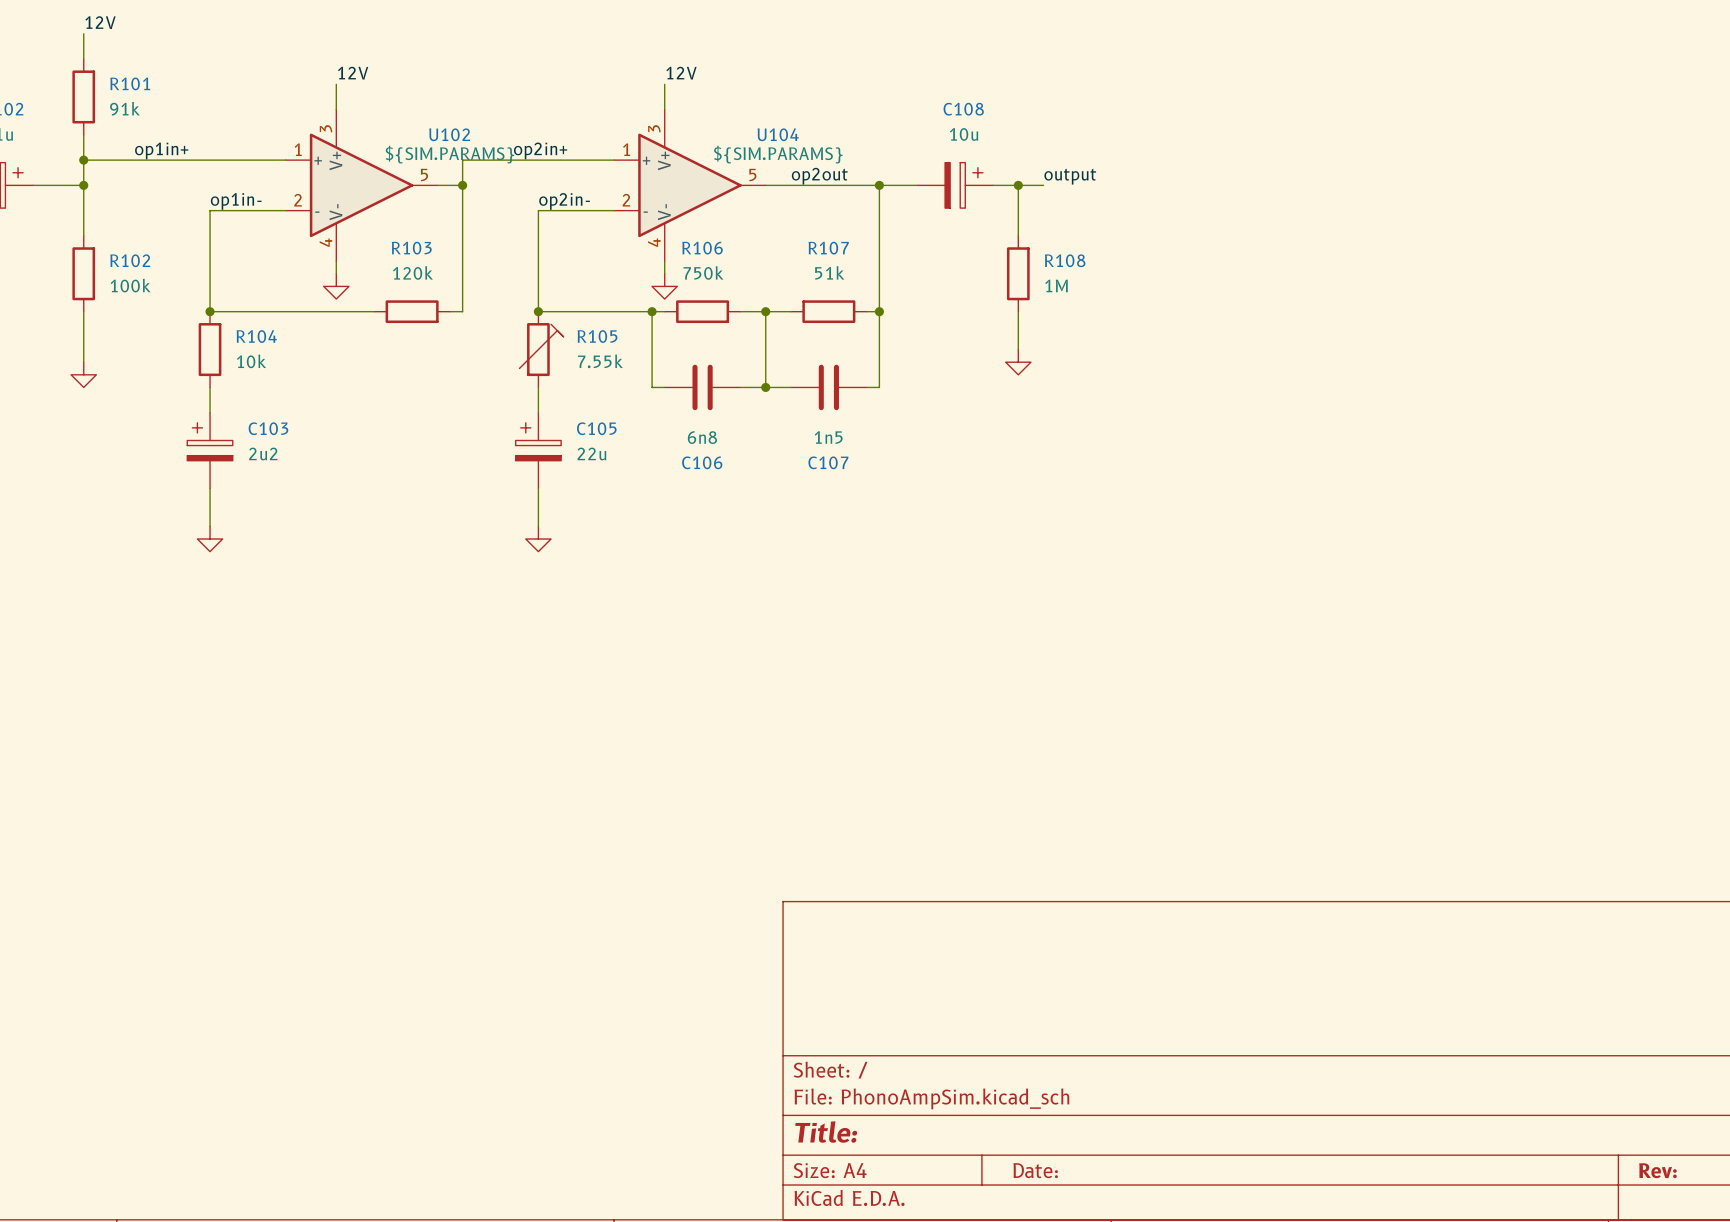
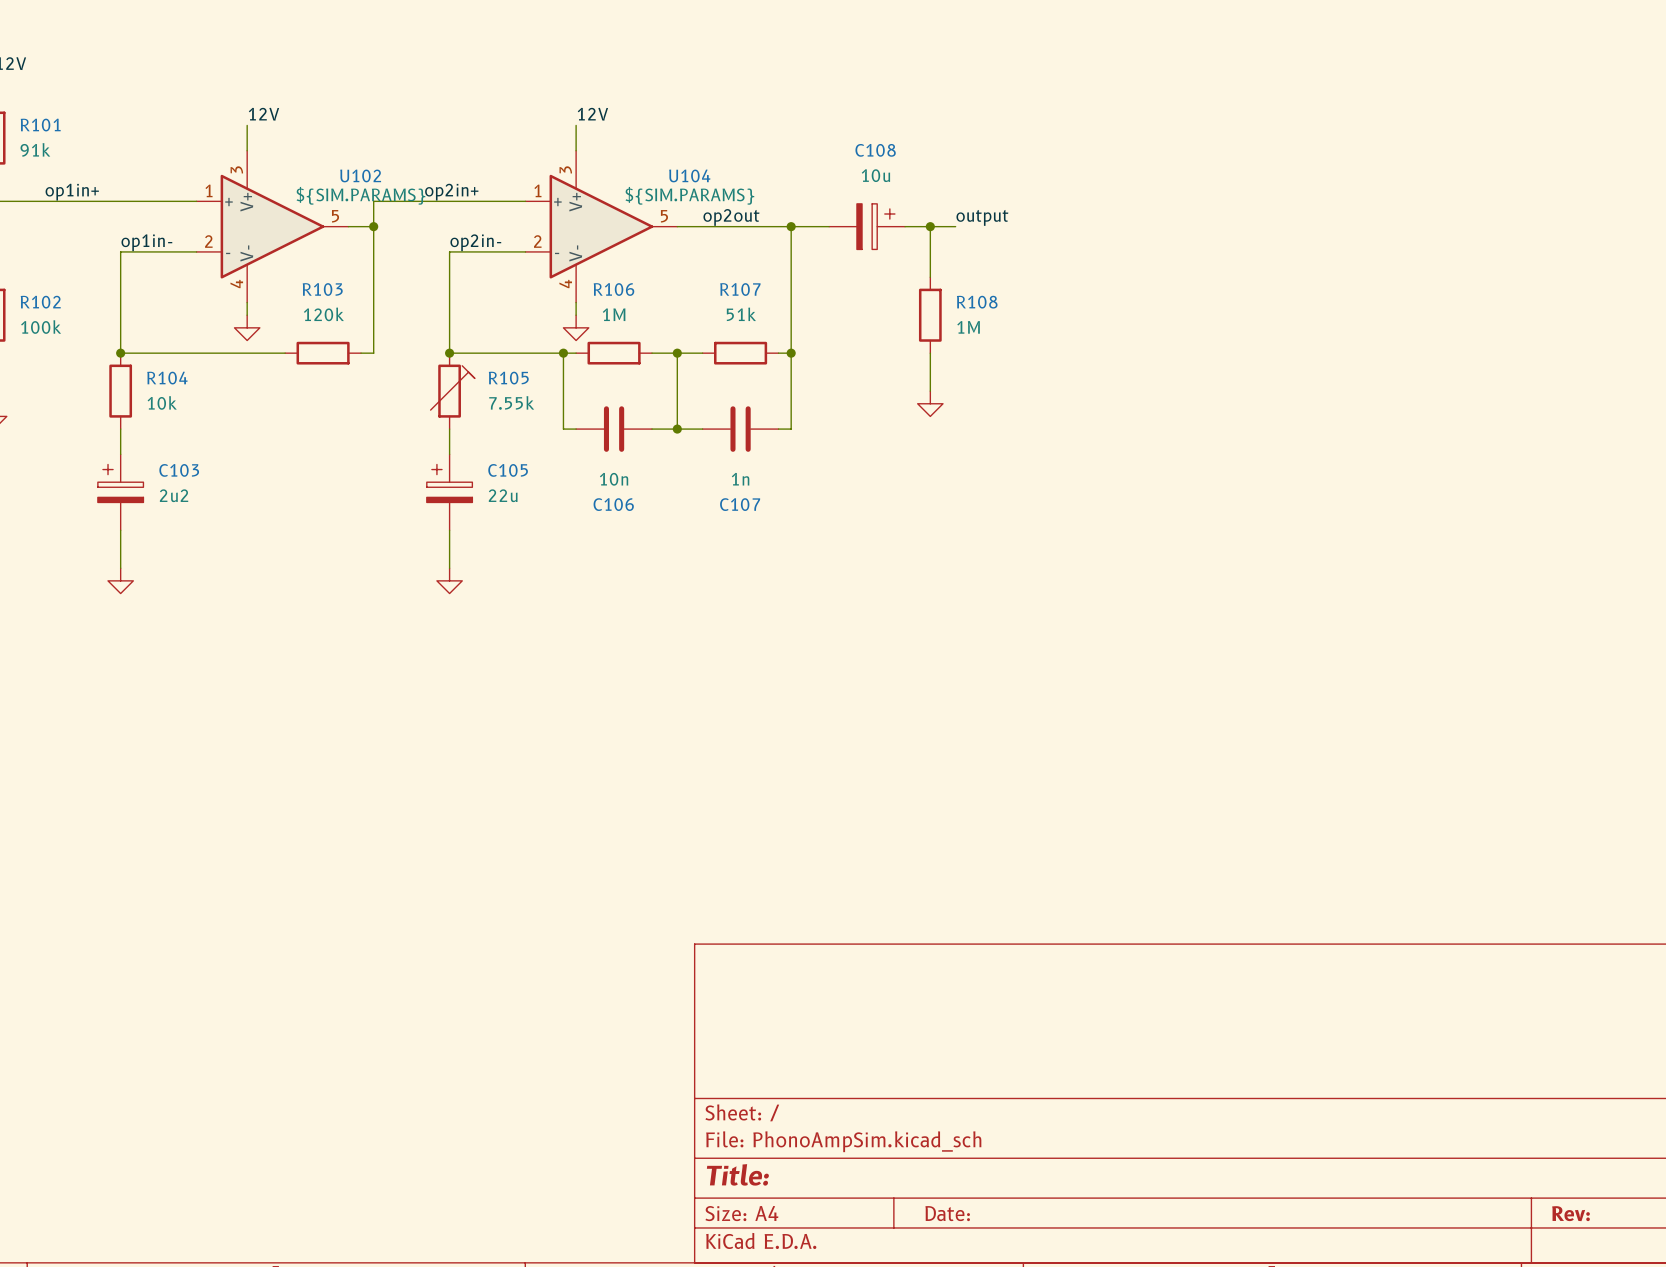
R106 value: 750k (703, 272) -> 1M (614, 314)
C106 value: 6n8 (702, 437) -> 10n (614, 479)
C107 value: 1n5 (828, 437) -> 1n (740, 479)

